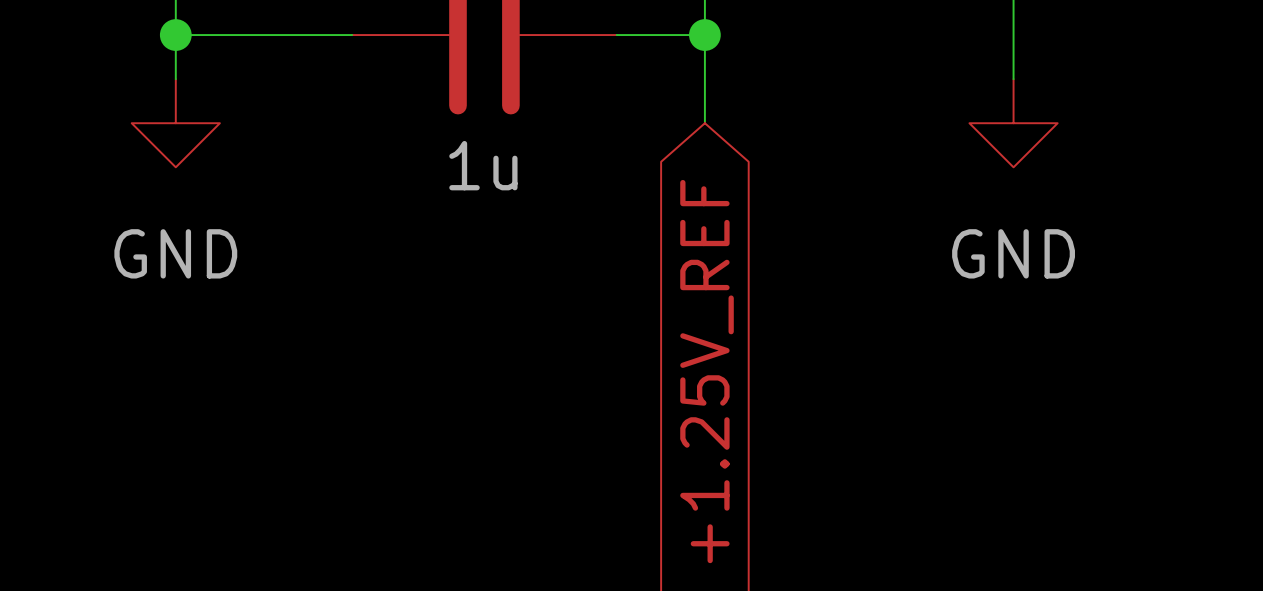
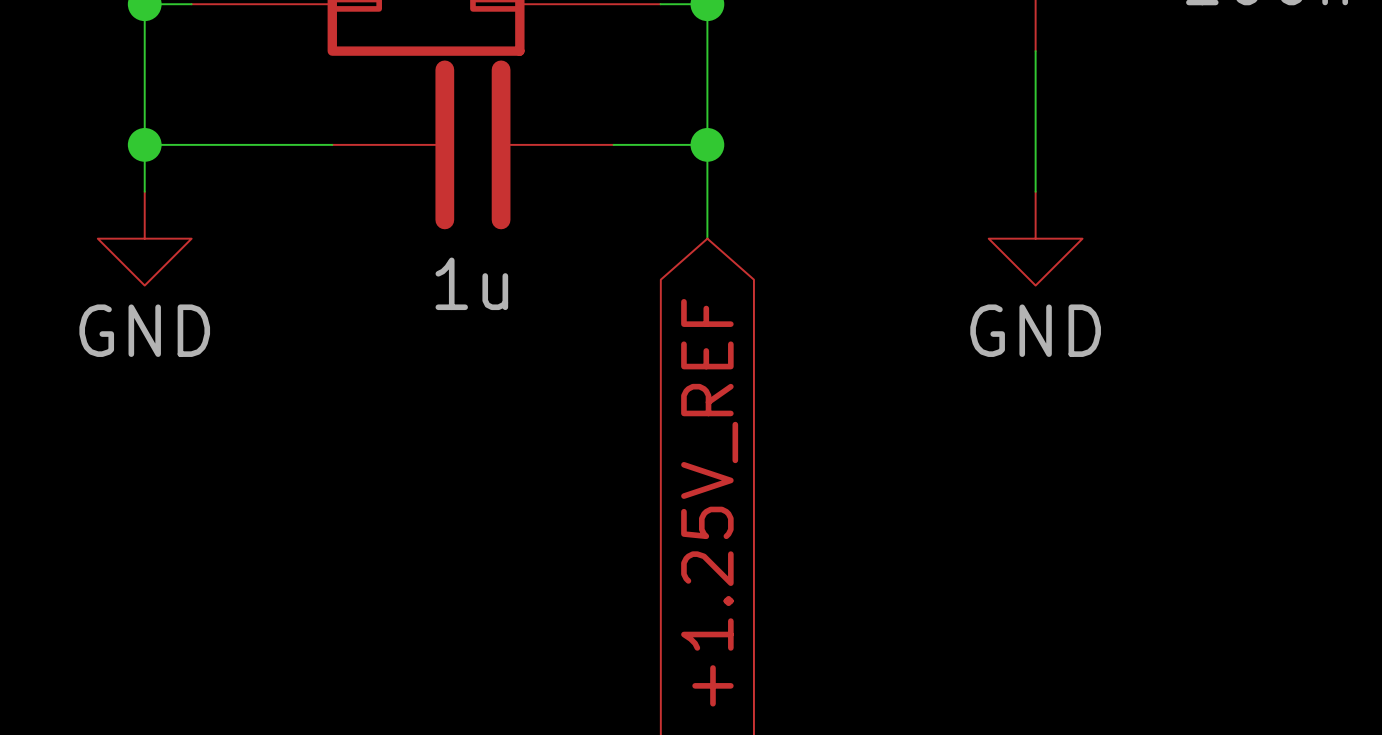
power symbol text position: GND (175, 253) -> GND (144, 330)
power symbol text position: GND (1013, 253) -> GND (1035, 330)

